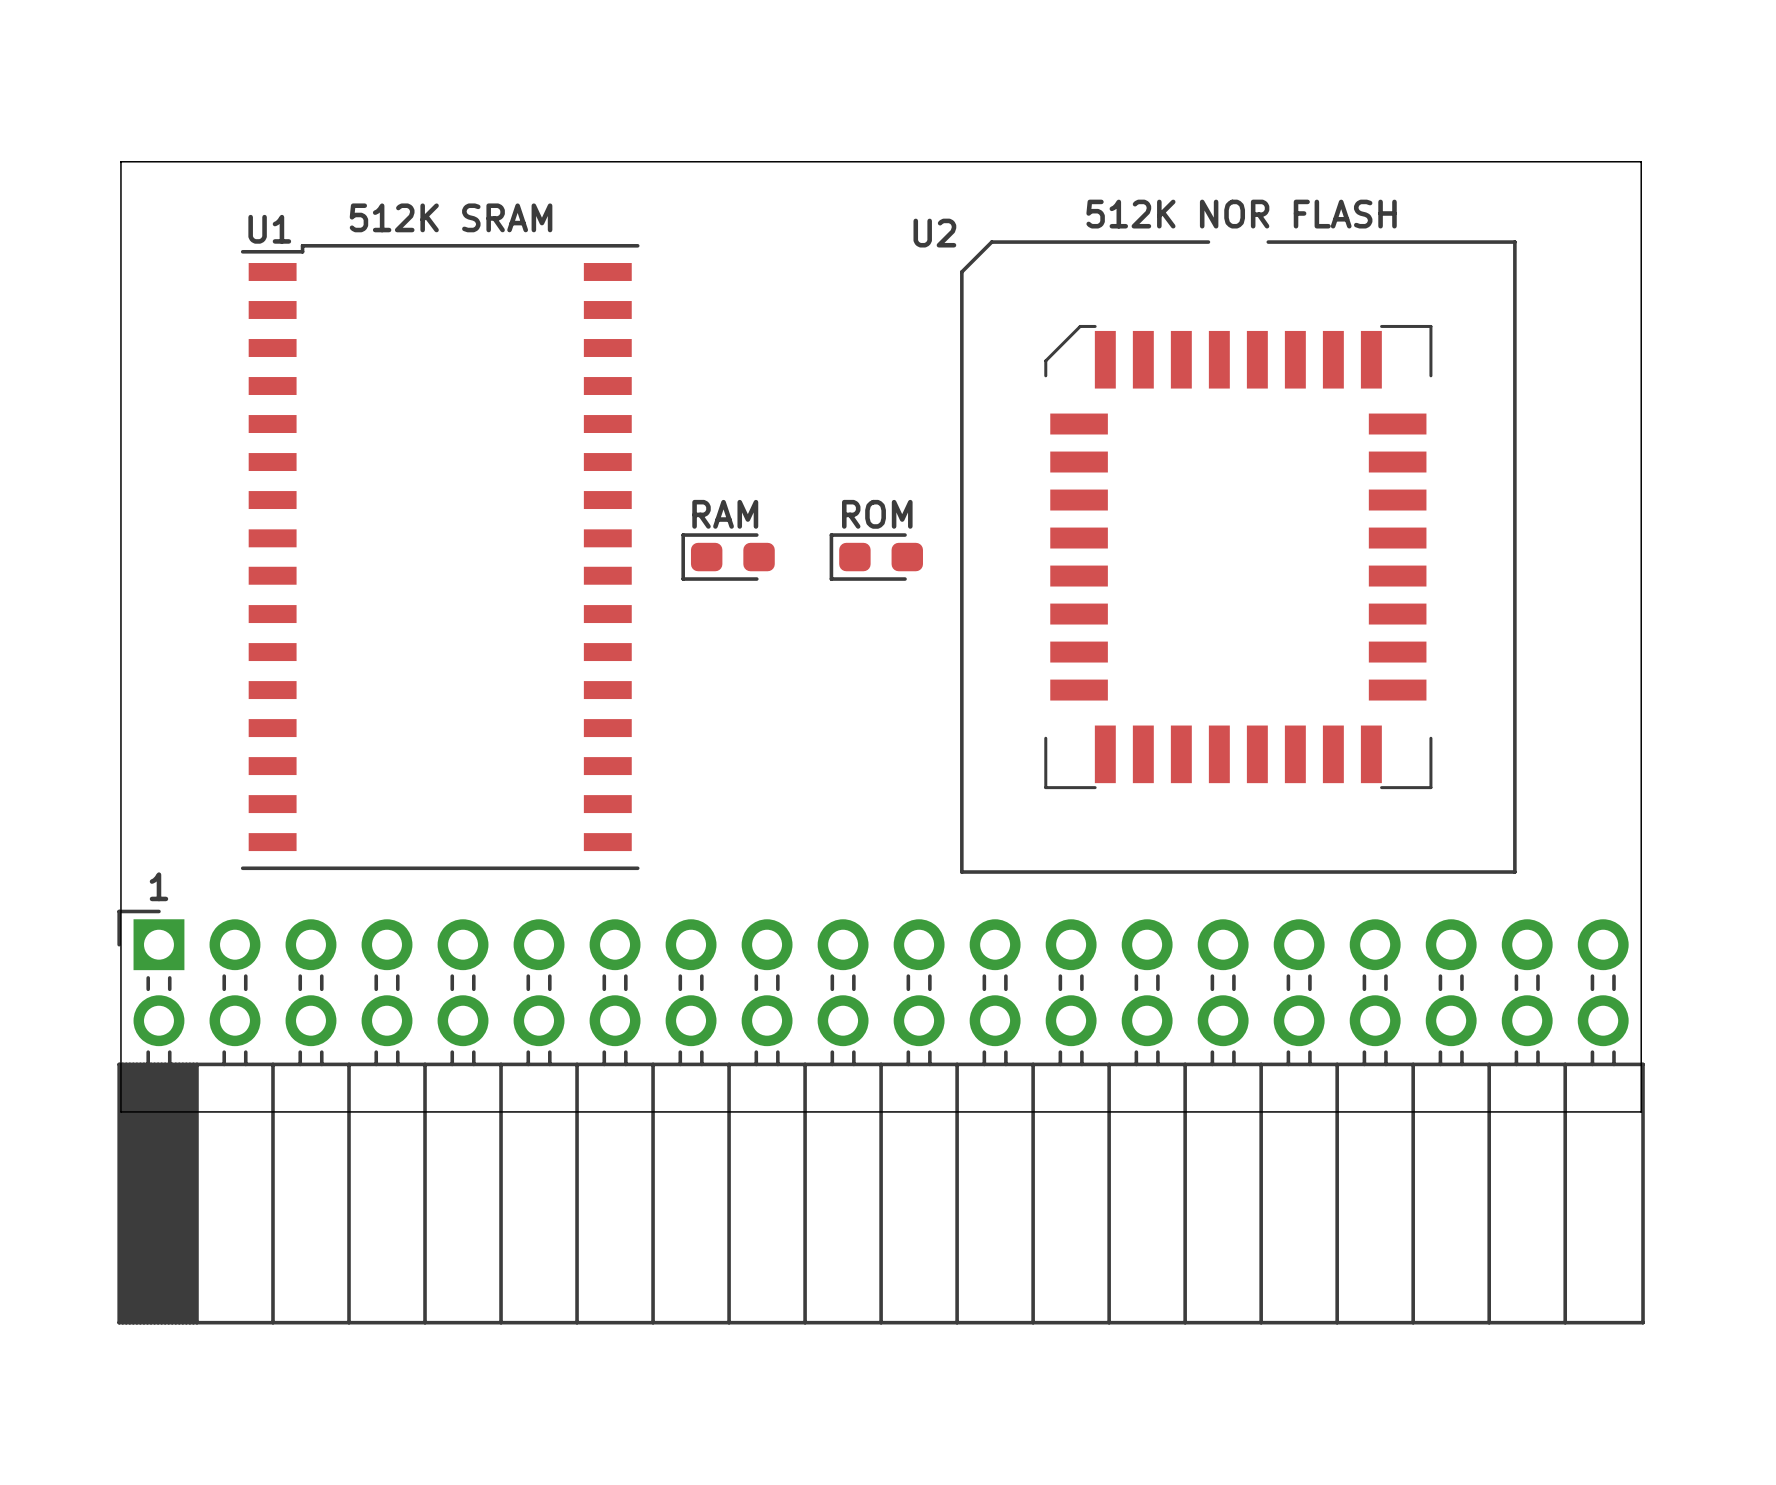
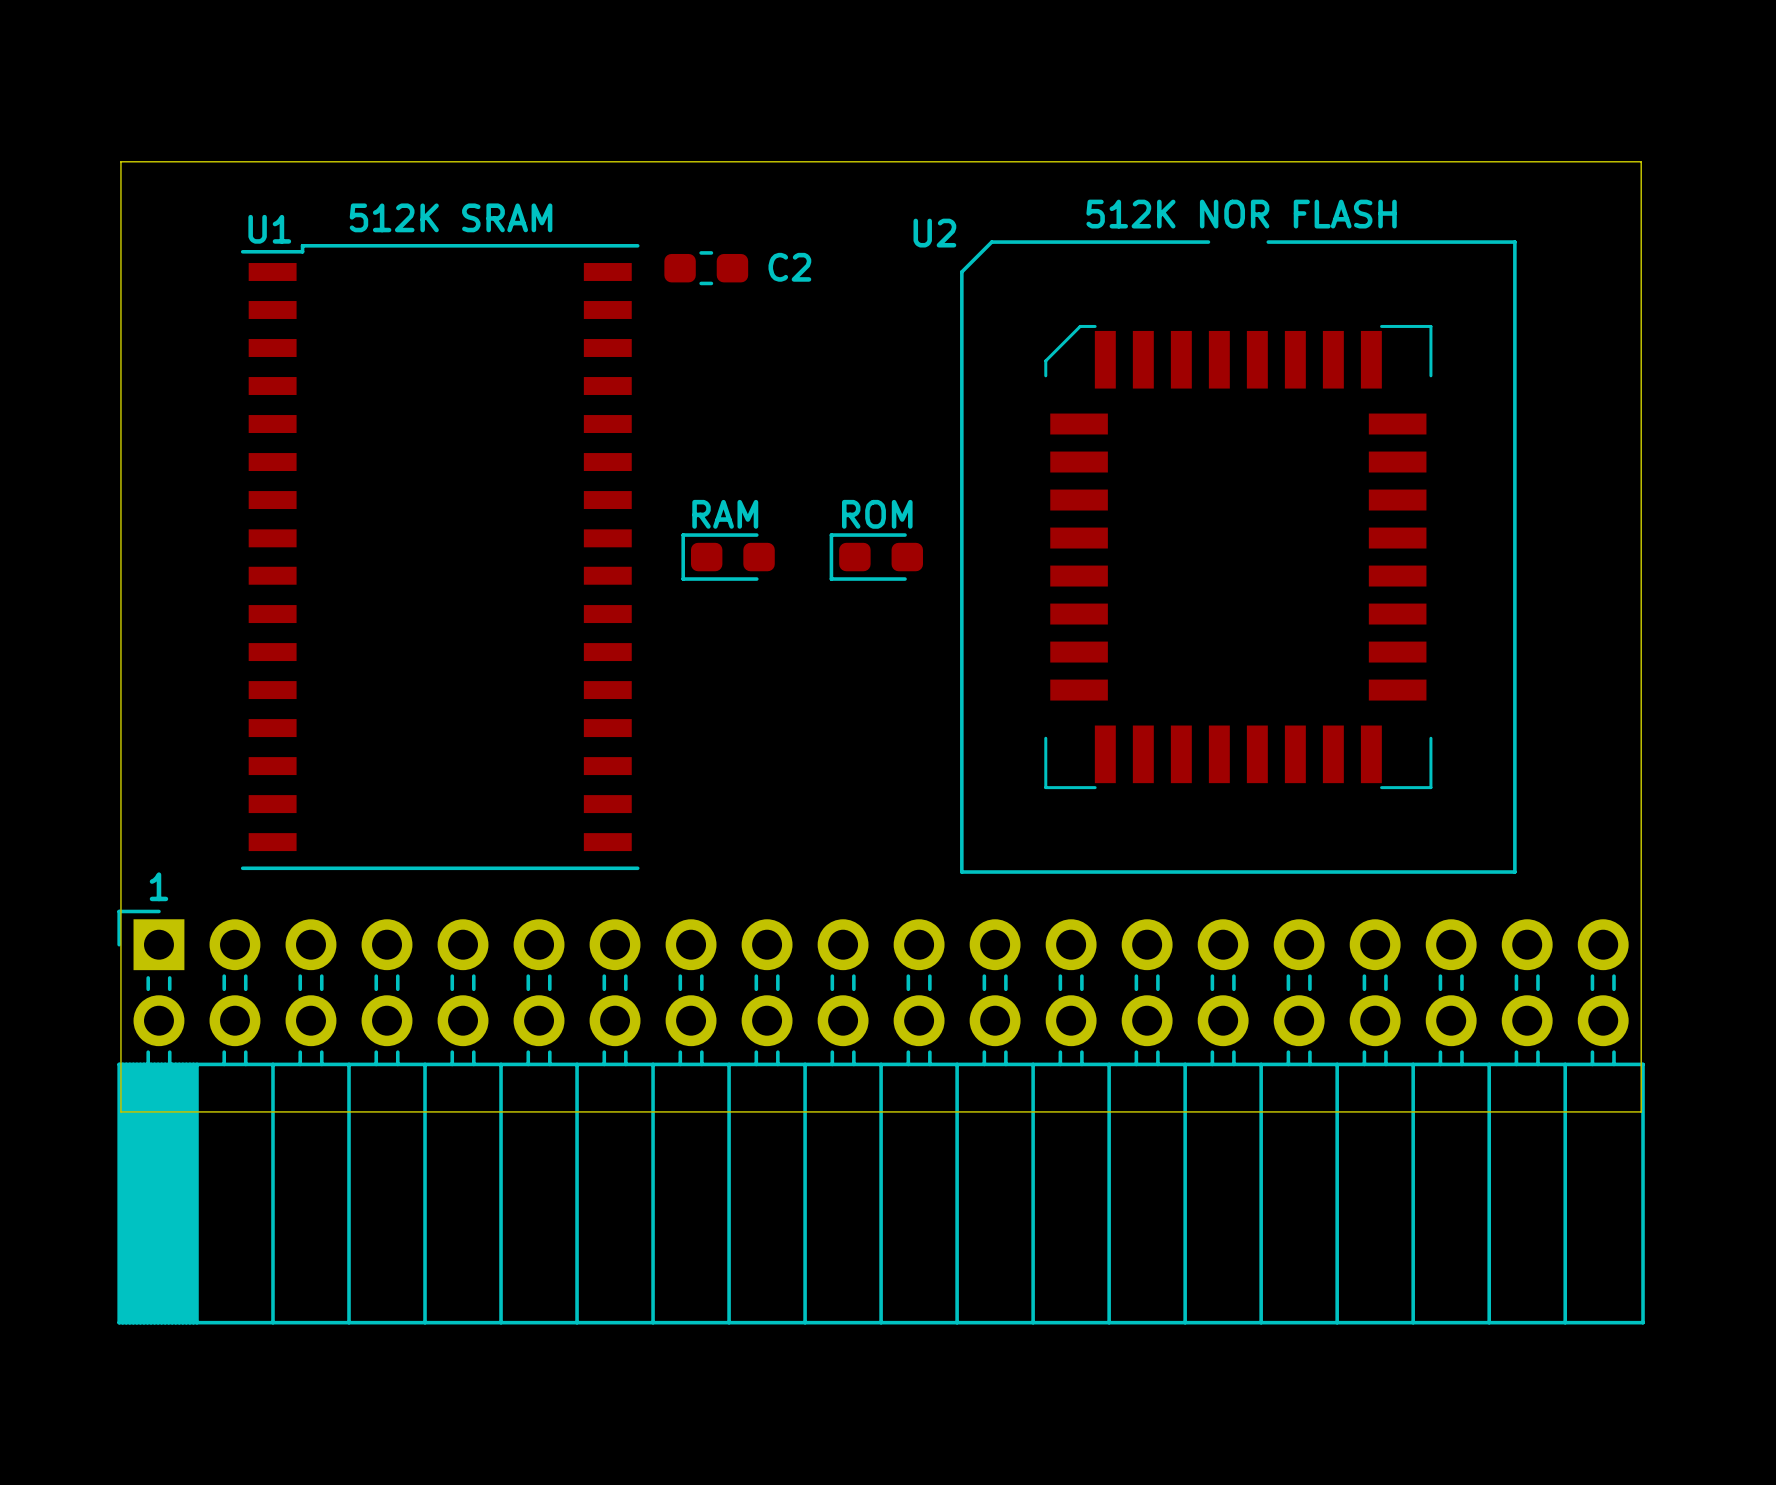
C2: none -> (706, 268)

